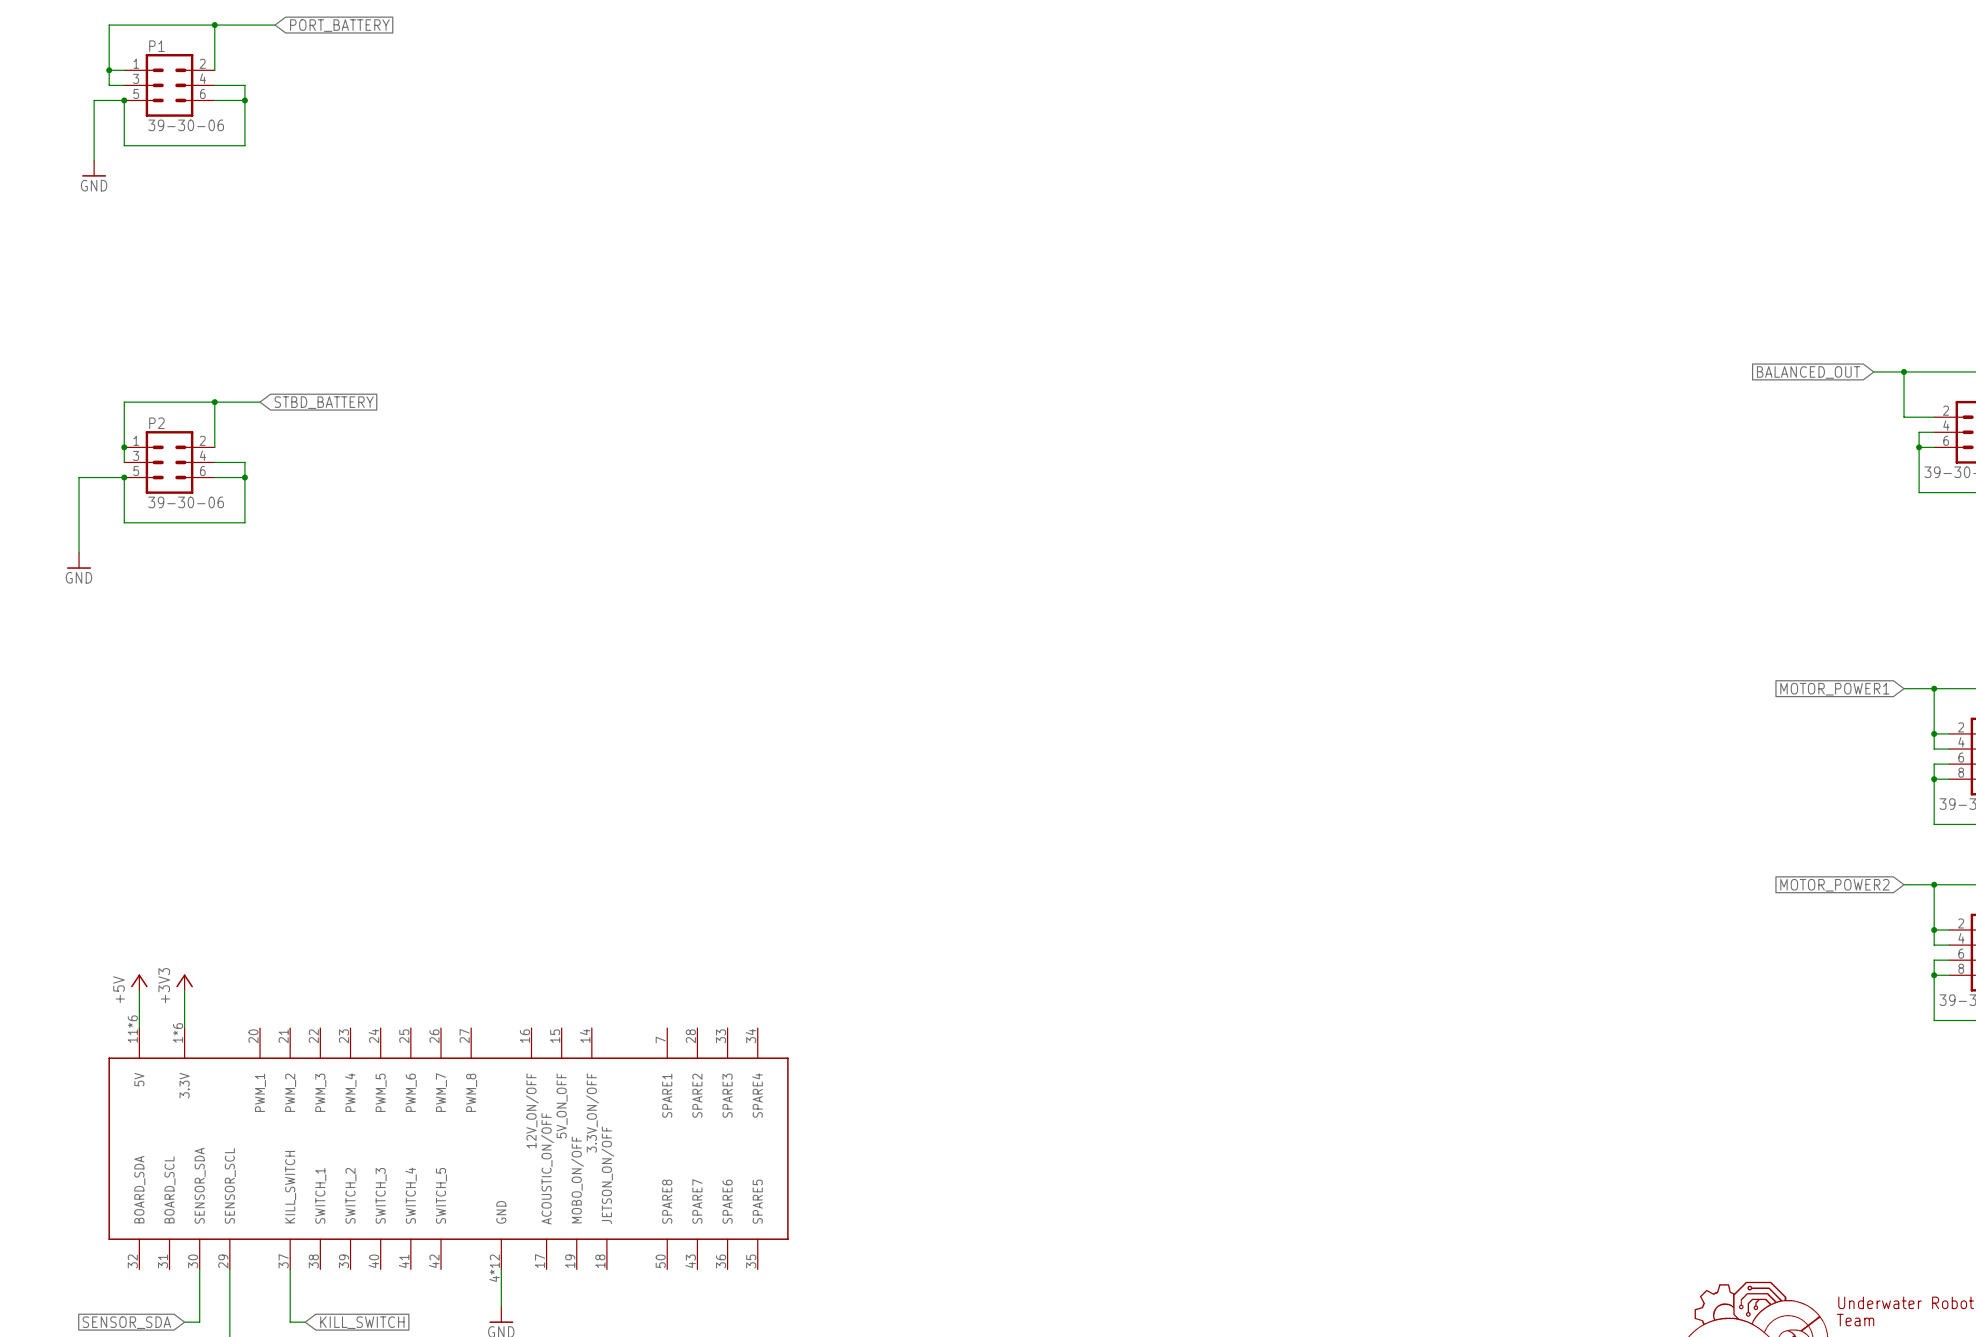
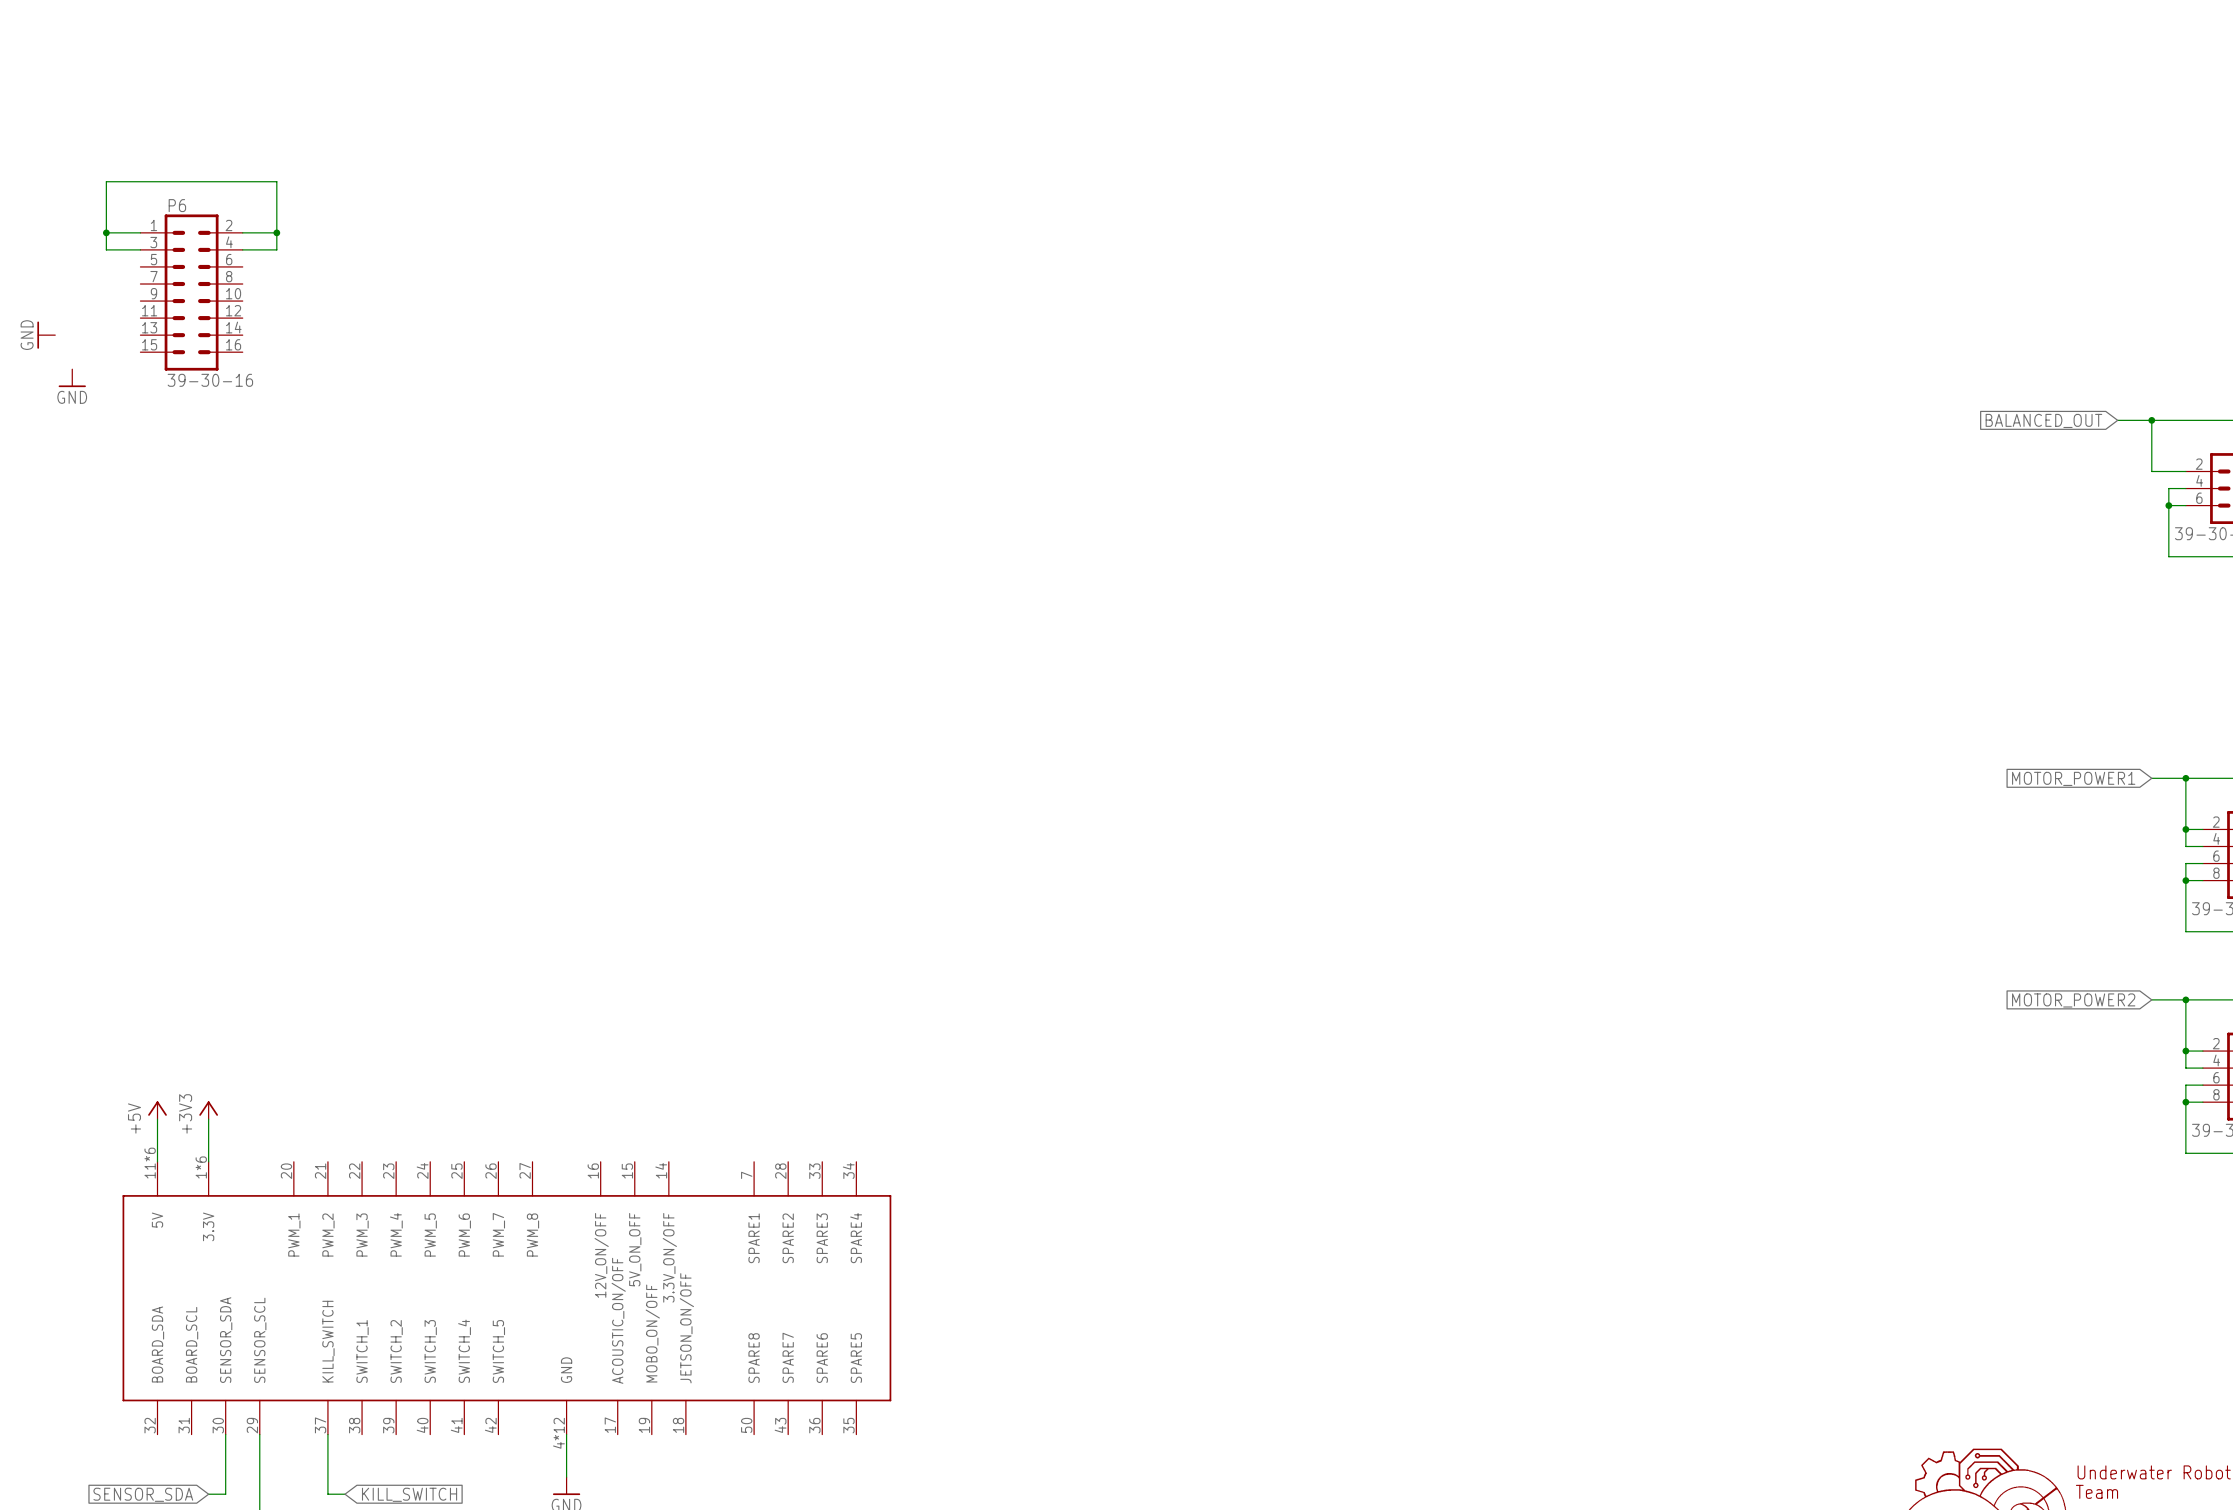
wire: (214, 25) (214, 70) -> none
junction: (214, 25) -> none
wire: (275, 25) (109, 25) (109, 85) (124, 85) -> none
global label: PORT_BATTERY (339, 25) -> none
wire: (109, 70) (124, 70) -> none
junction: (109, 70) -> none
P1: 39-30-06 (169, 85) -> none
wire: (214, 85) (244, 85) (244, 145) (124, 145) (124, 100) (94, 100) (94, 160) -> none
junction: (124, 100) -> none
wire: (214, 100) (244, 100) -> (242, 232) (276, 232)
junction: (244, 100) -> none
power symbol: GND (94, 168) -> none
wire: none -> (106, 232) (140, 232)
junction: none -> (106, 232)
junction: none -> (276, 232)
wire: none -> (140, 249) (106, 249) (106, 181) (276, 181) (276, 249) (242, 249)
P6: none -> 39-30-16 (191, 292)
power symbol: none -> GND (46, 335)
power symbol: none -> GND (72, 378)
wire: (214, 402) (214, 447) -> none
junction: (214, 402) -> none
wire: (260, 402) (124, 402) (124, 462) -> none
global label: STBD_BATTERY (324, 402) -> none
junction: (124, 447) -> none
P2: 39-30-06 (169, 462) -> none
wire: (214, 462) (244, 462) (244, 522) (124, 522) (124, 477) (79, 477) (79, 552) -> none
junction: (124, 477) -> none
wire: (214, 477) (244, 477) -> none
junction: (244, 477) -> none
power symbol: GND (79, 560) -> none

